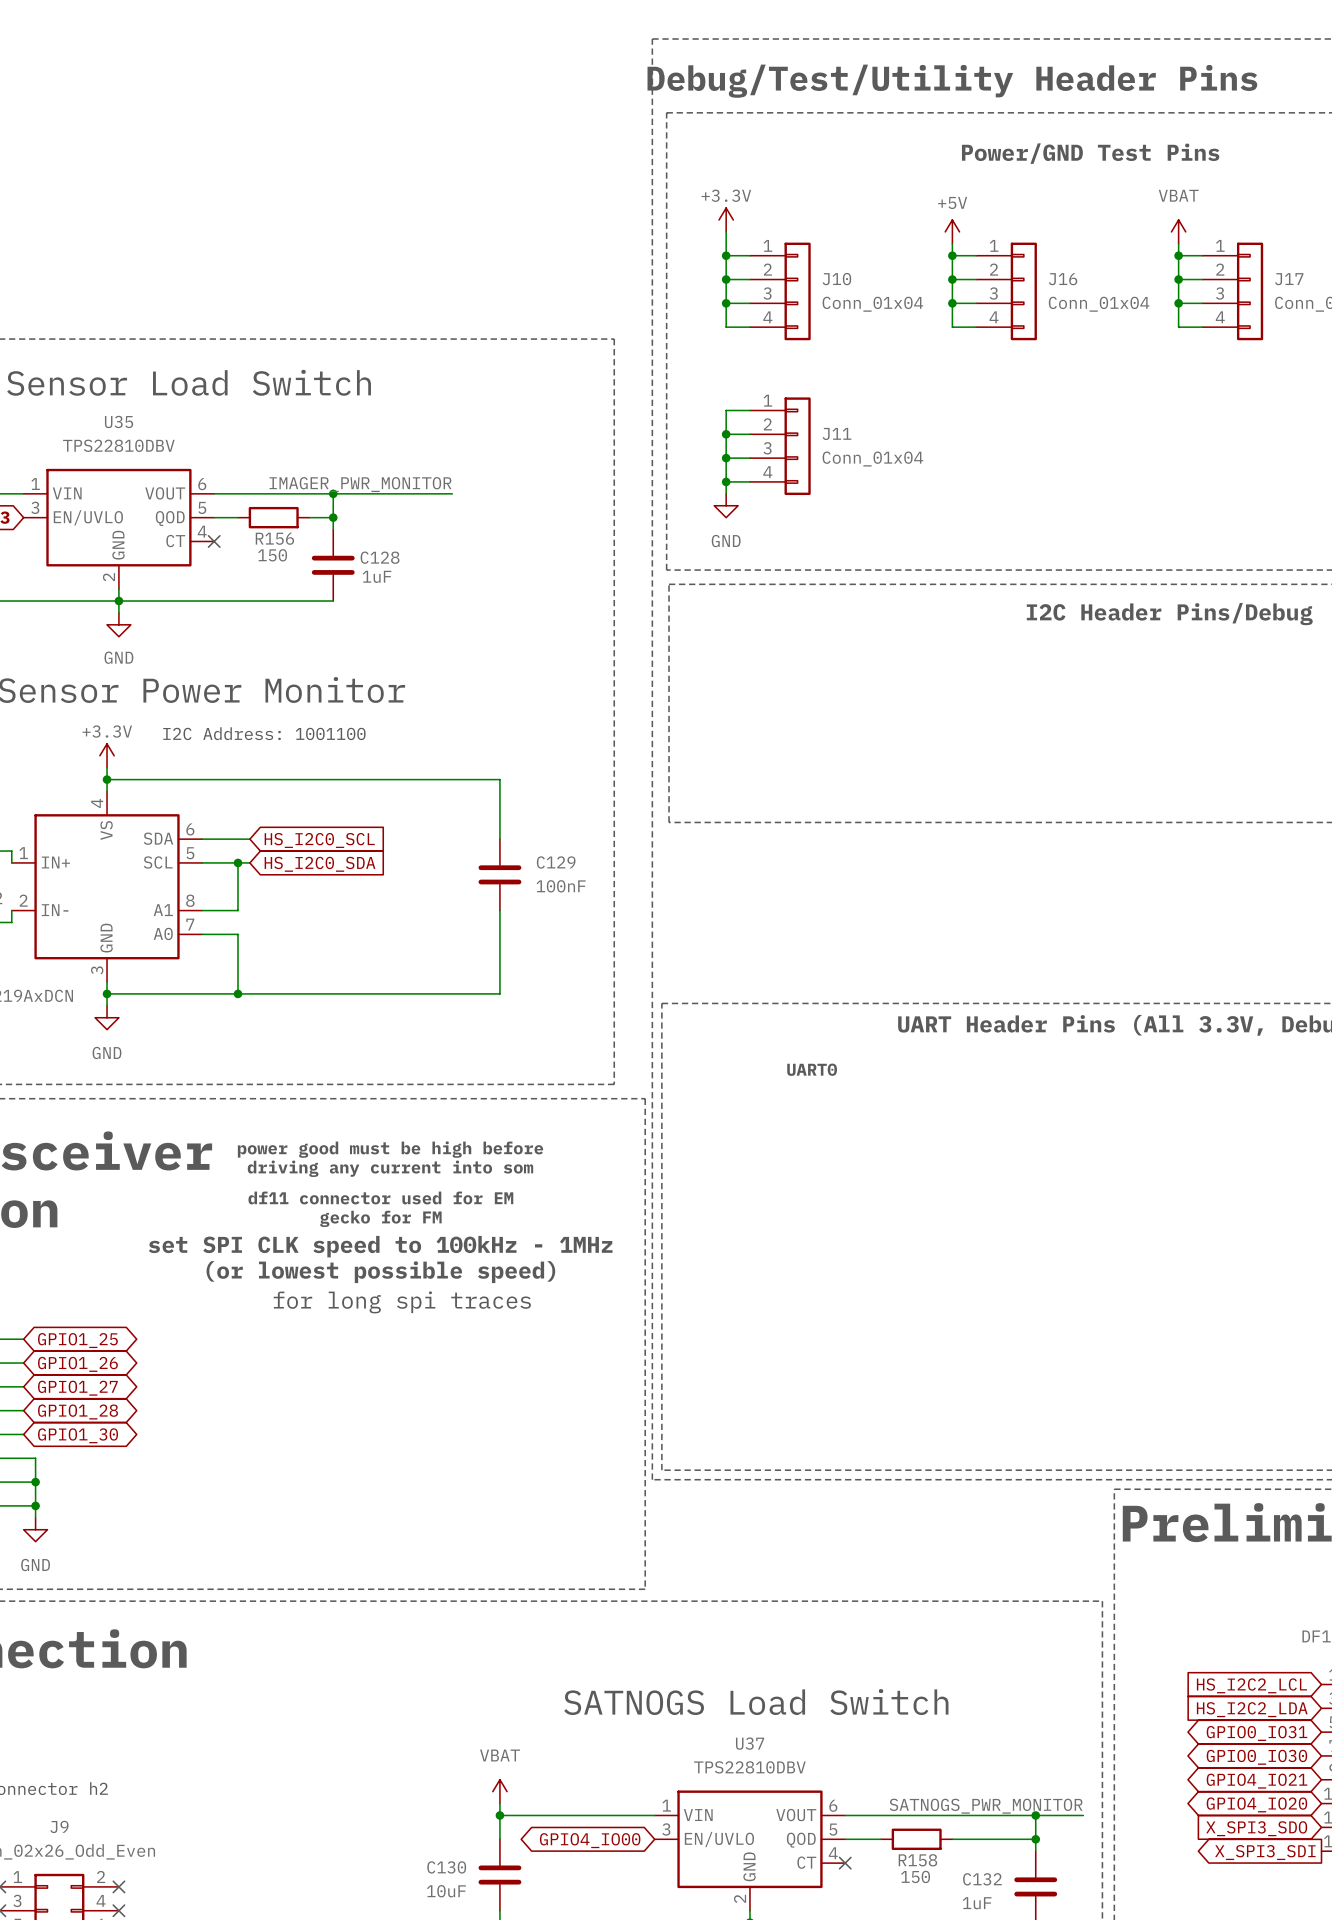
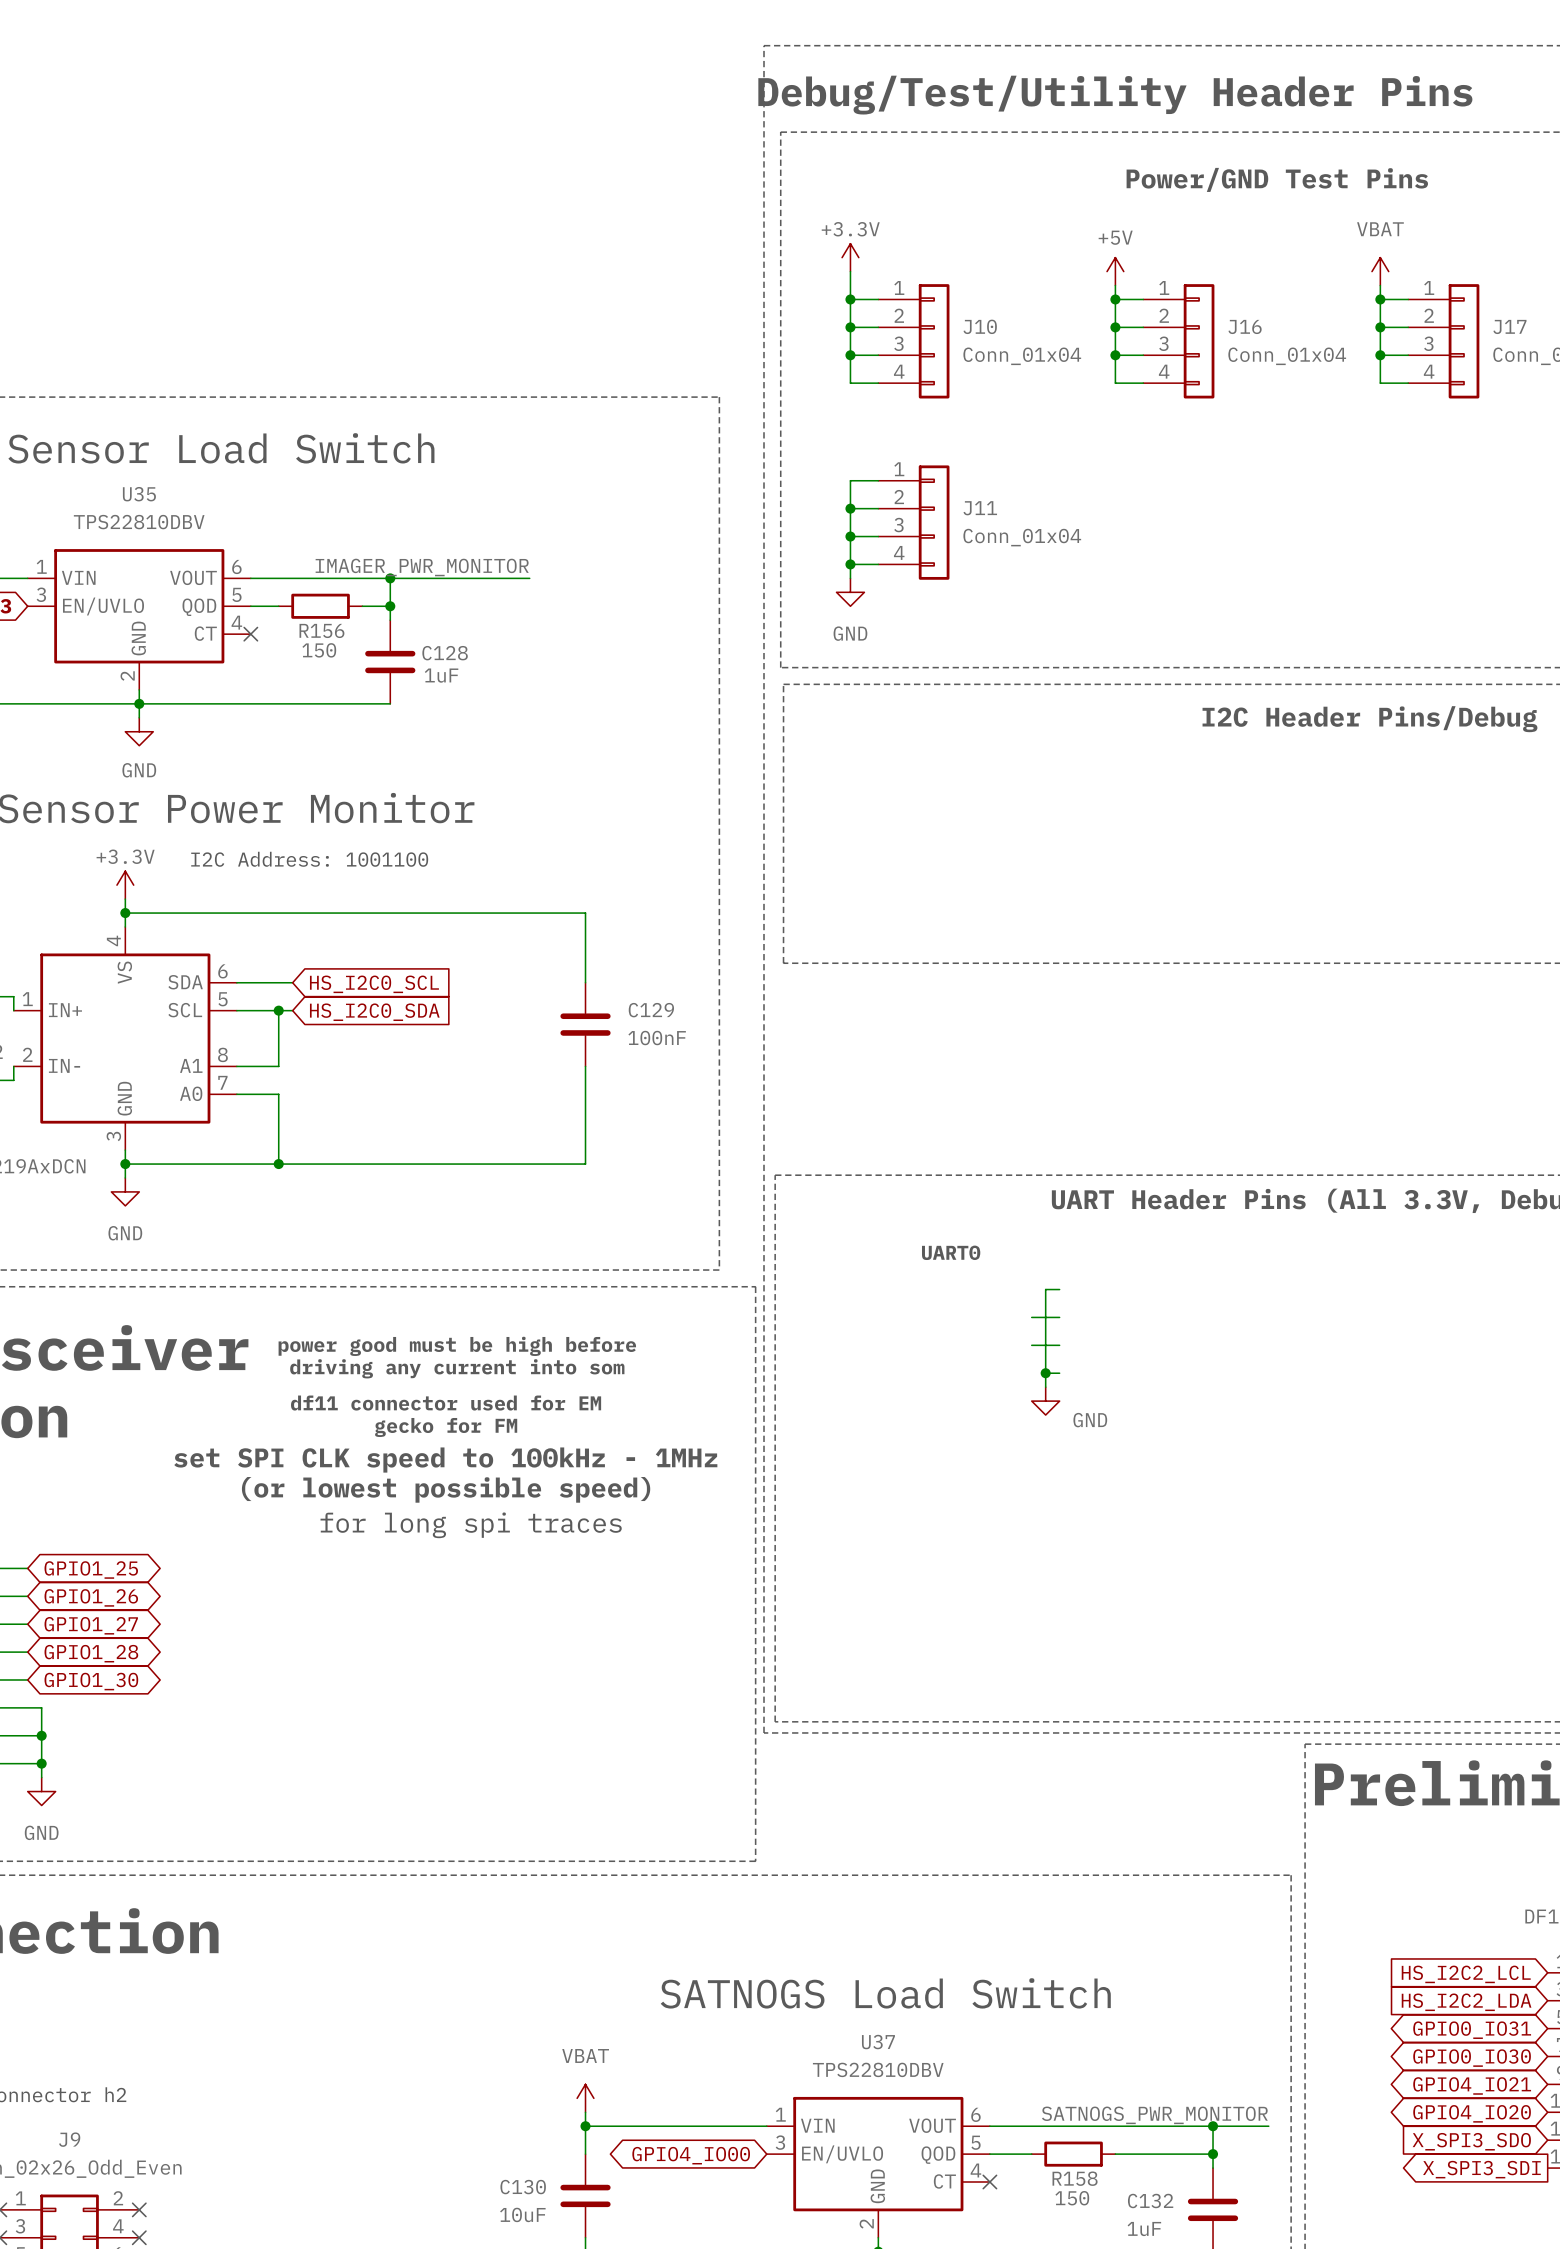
wire: none -> (1059, 1289) (1045, 1289) (1045, 1387)
wire: none -> (1031, 1317) (1059, 1317)
wire: none -> (1031, 1345) (1059, 1345)
wire: none -> (1045, 1373) (1059, 1373)
junction: none -> (1045, 1373)
power symbol: none -> GND (1045, 1401)

